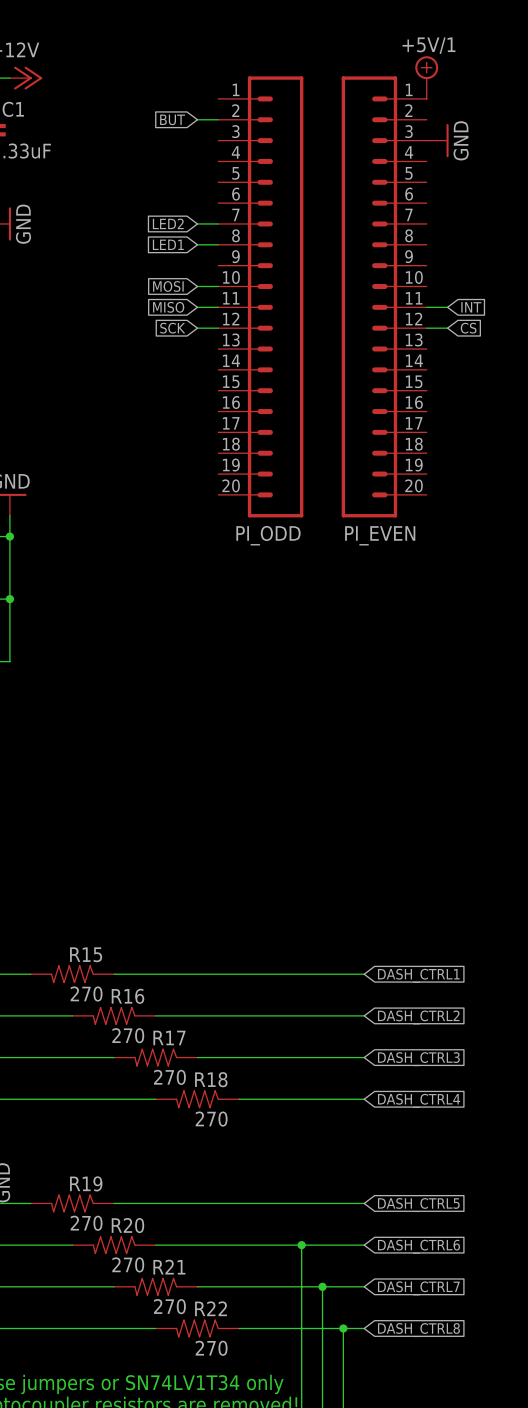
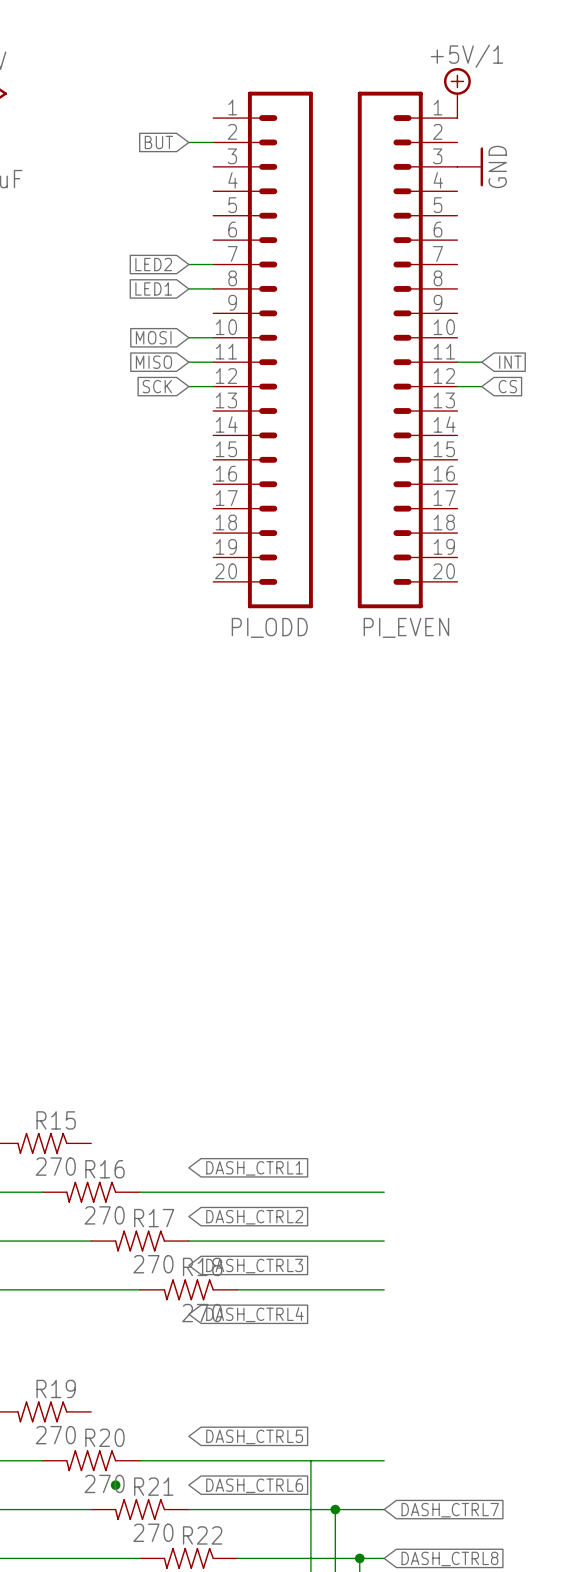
wire: (114, 974) (364, 974) -> none
global label position: DASH_CTRL1 (418, 975) -> DASH_CTRL1 (254, 1168)
global label position: DASH_CTRL2 (418, 1017) -> DASH_CTRL2 (254, 1217)
global label position: DASH_CTRL3 (418, 1059) -> DASH_CTRL3 (254, 1266)
global label position: DASH_CTRL4 (419, 1100) -> DASH_CTRL4 (254, 1314)
wire: (114, 1203) (364, 1203) -> none
global label position: DASH_CTRL5 (418, 1205) -> DASH_CTRL5 (254, 1436)
junction: (301, 1245) -> none
global label position: DASH_CTRL6 (418, 1246) -> DASH_CTRL6 (254, 1485)
junction: none -> (115, 1485)

